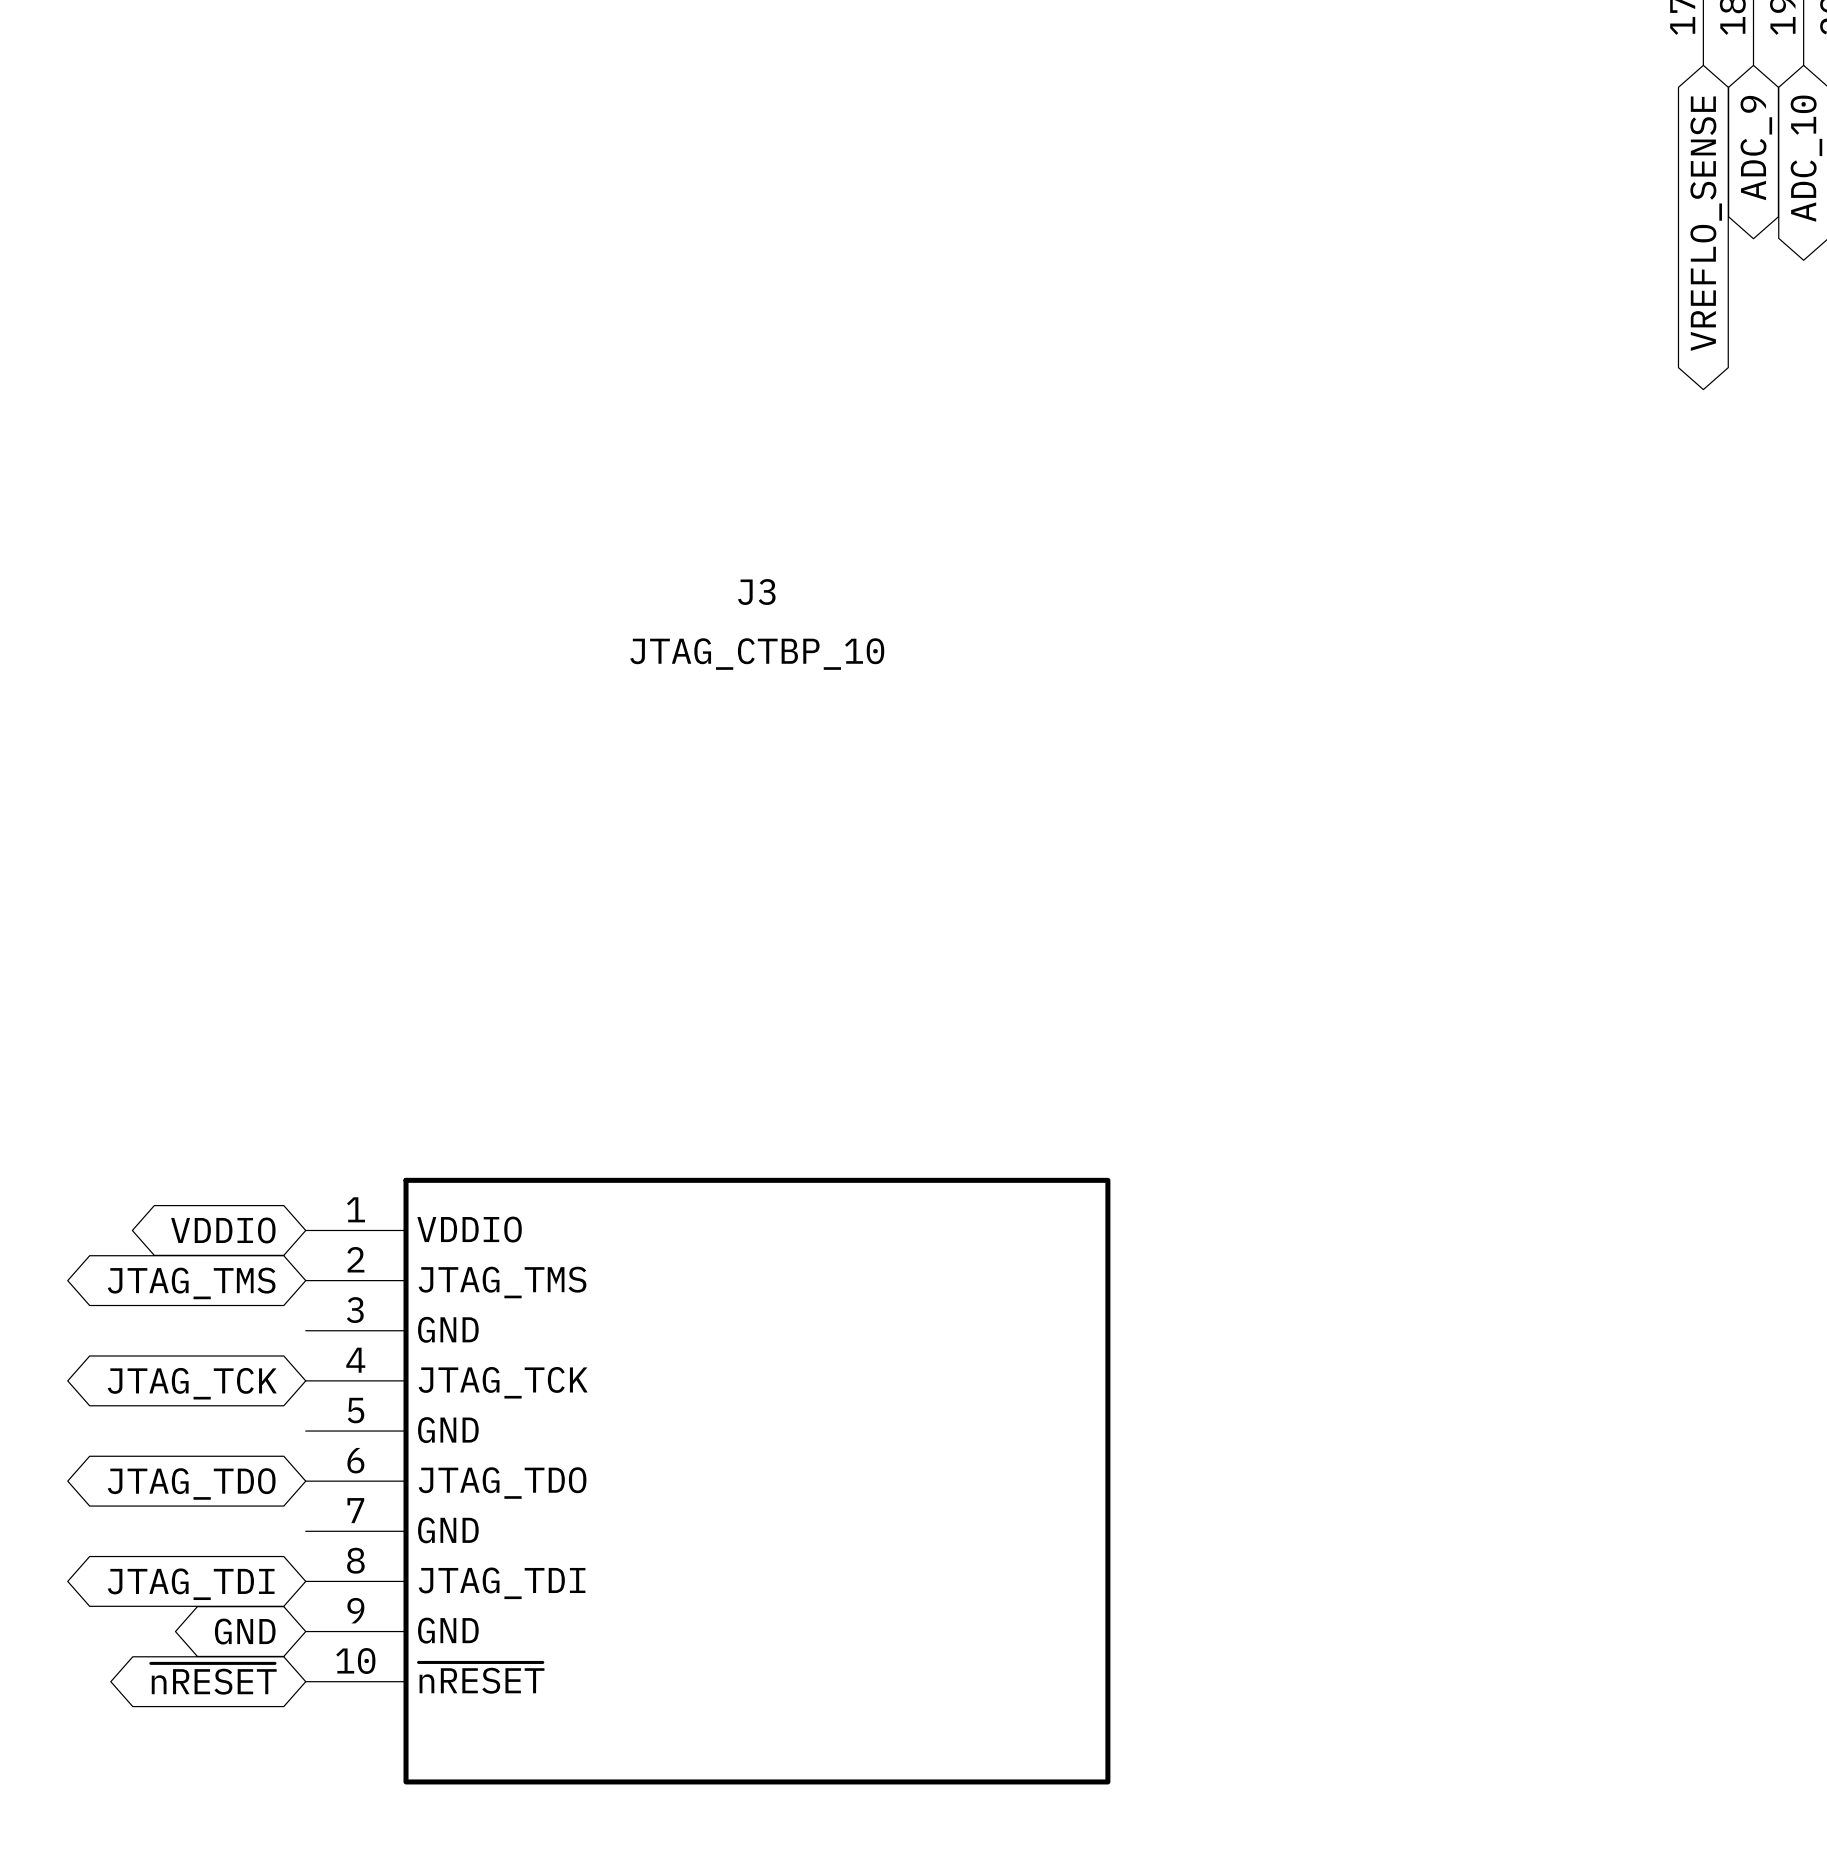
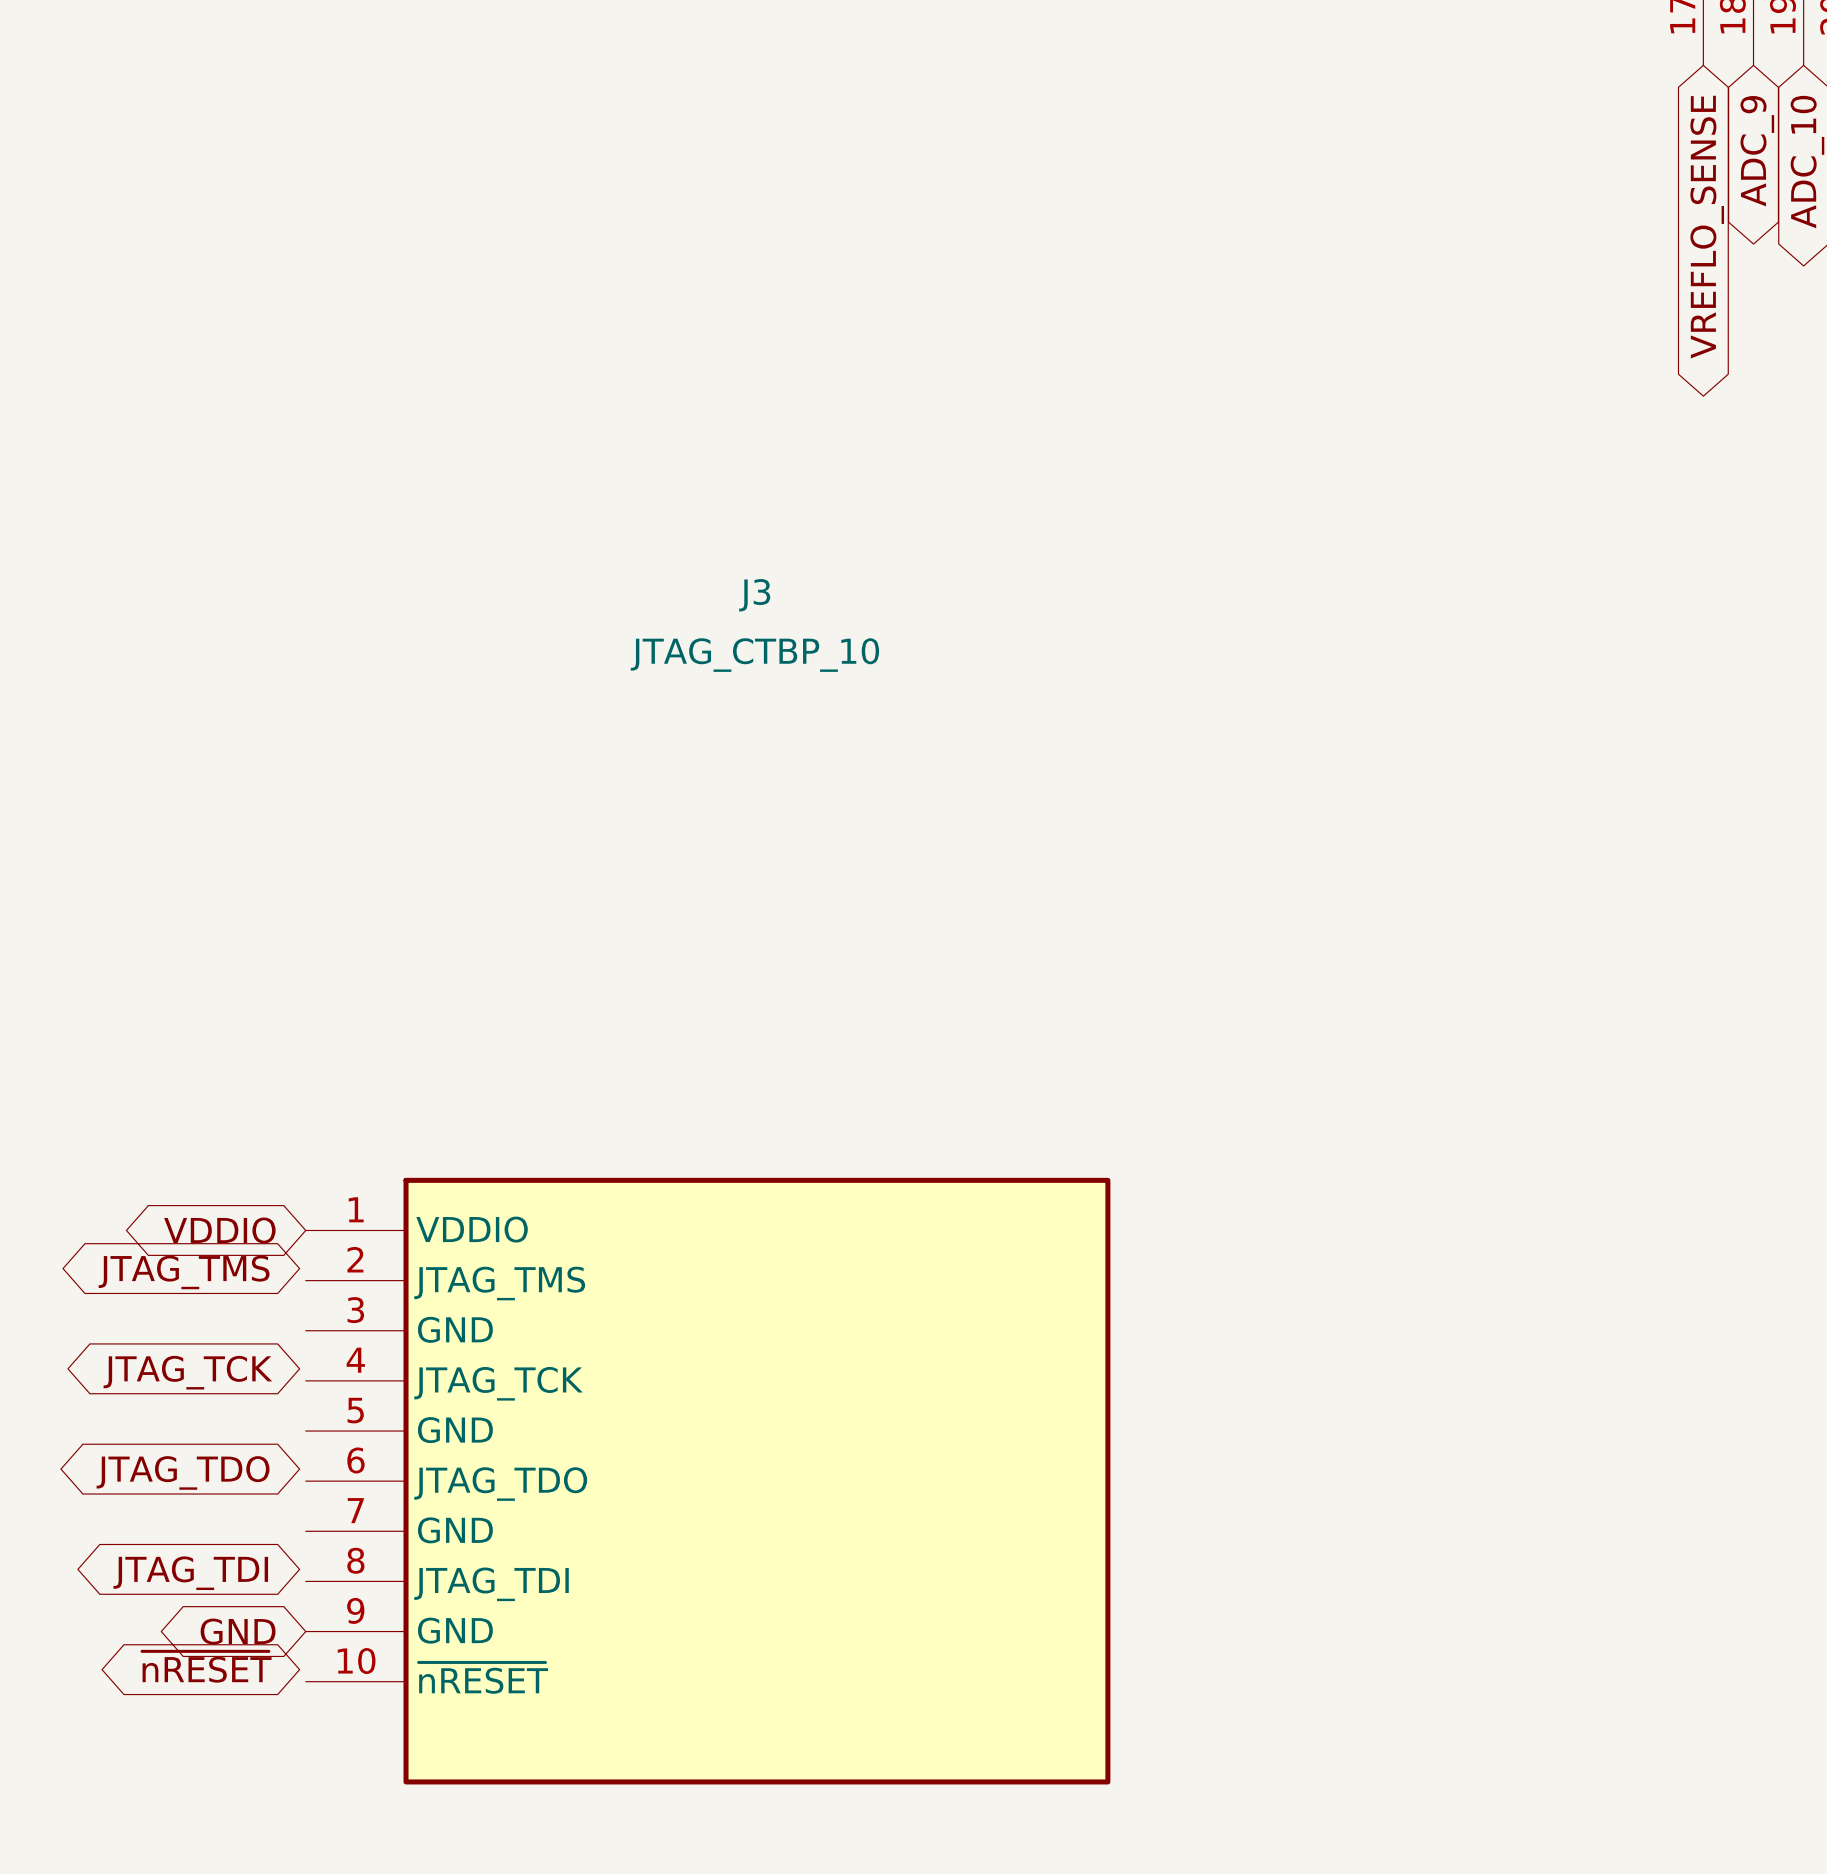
global label position: JTAG_TMS (191, 1283) -> JTAG_TMS (184, 1272)
global label position: JTAG_TCK (192, 1383) -> JTAG_TCK (187, 1372)
global label position: JTAG_TDO (191, 1483) -> JTAG_TDO (183, 1472)
global label position: JTAG_TDI (191, 1584) -> JTAG_TDI (190, 1573)
global label position: ~{nRESET} (213, 1679) -> ~{nRESET} (206, 1667)

